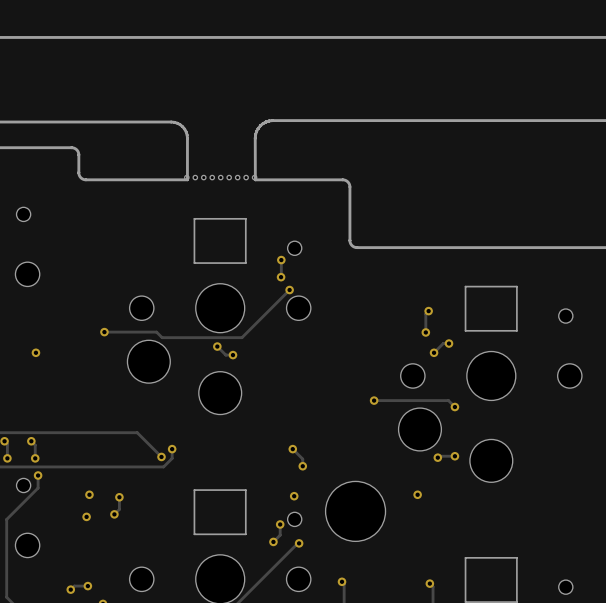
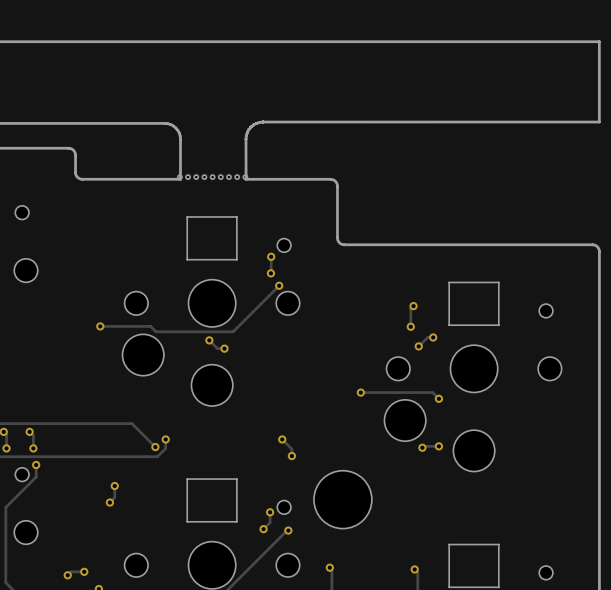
via: (35, 352) -> none
via: (89, 494) -> none
via: (417, 494) -> none
via: (294, 496) -> none
via: (86, 516) -> none

